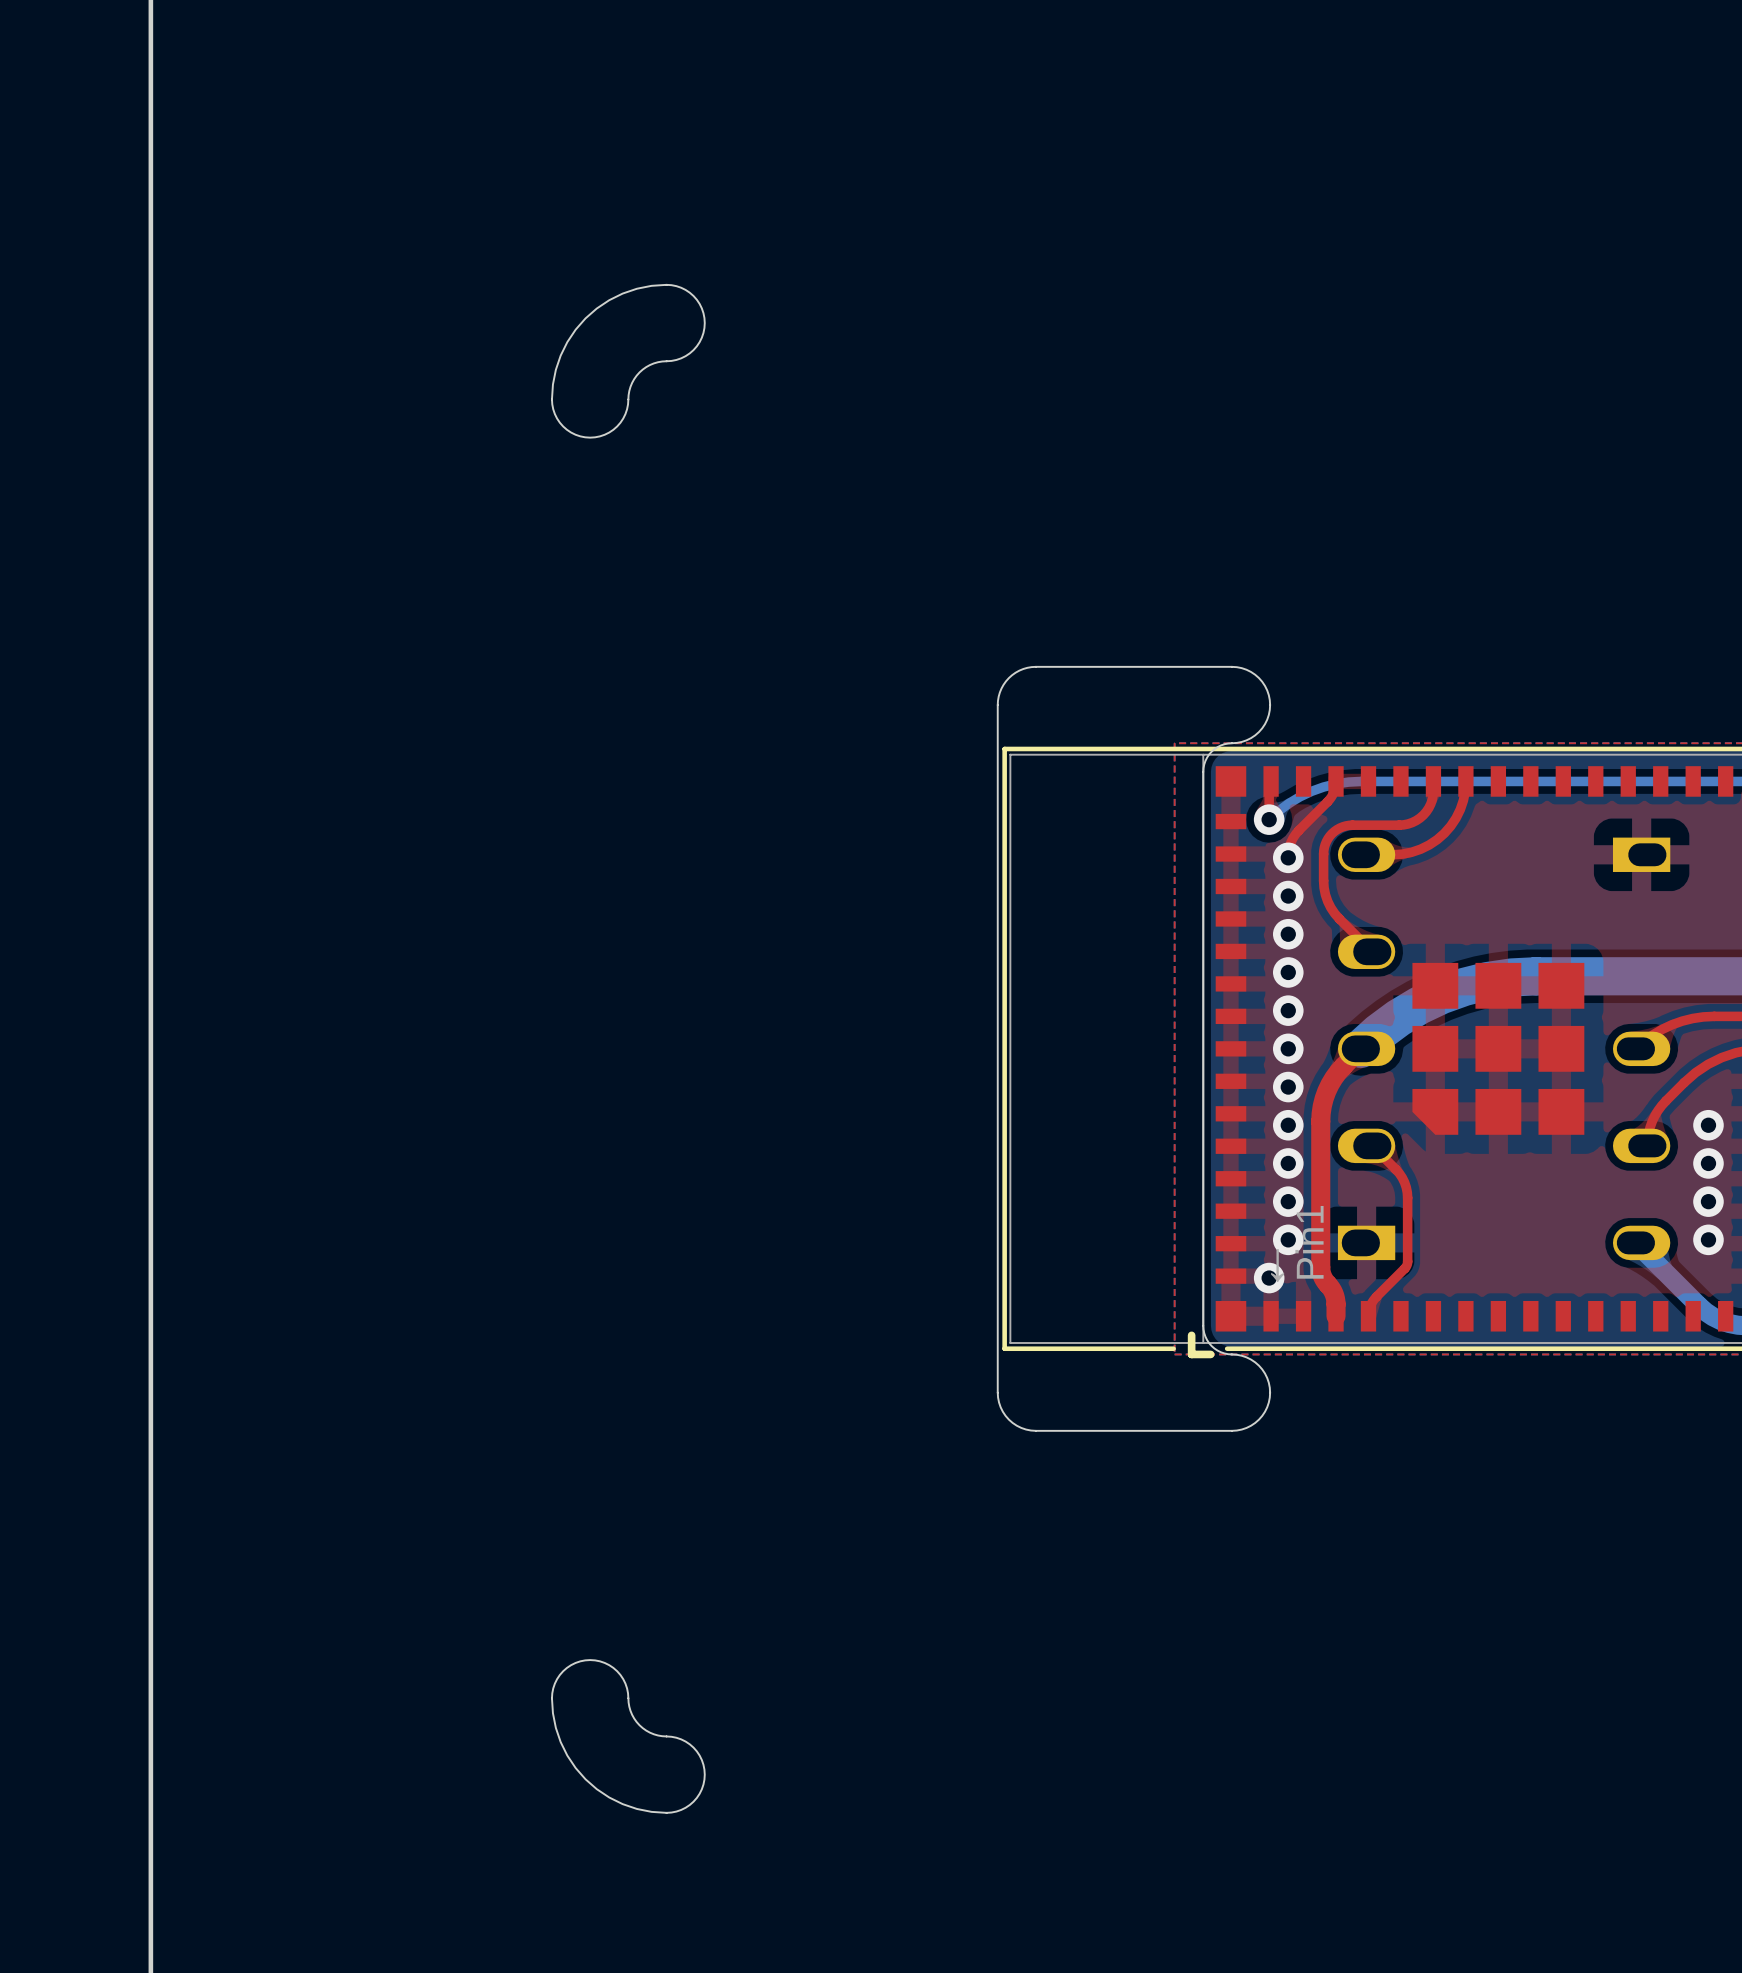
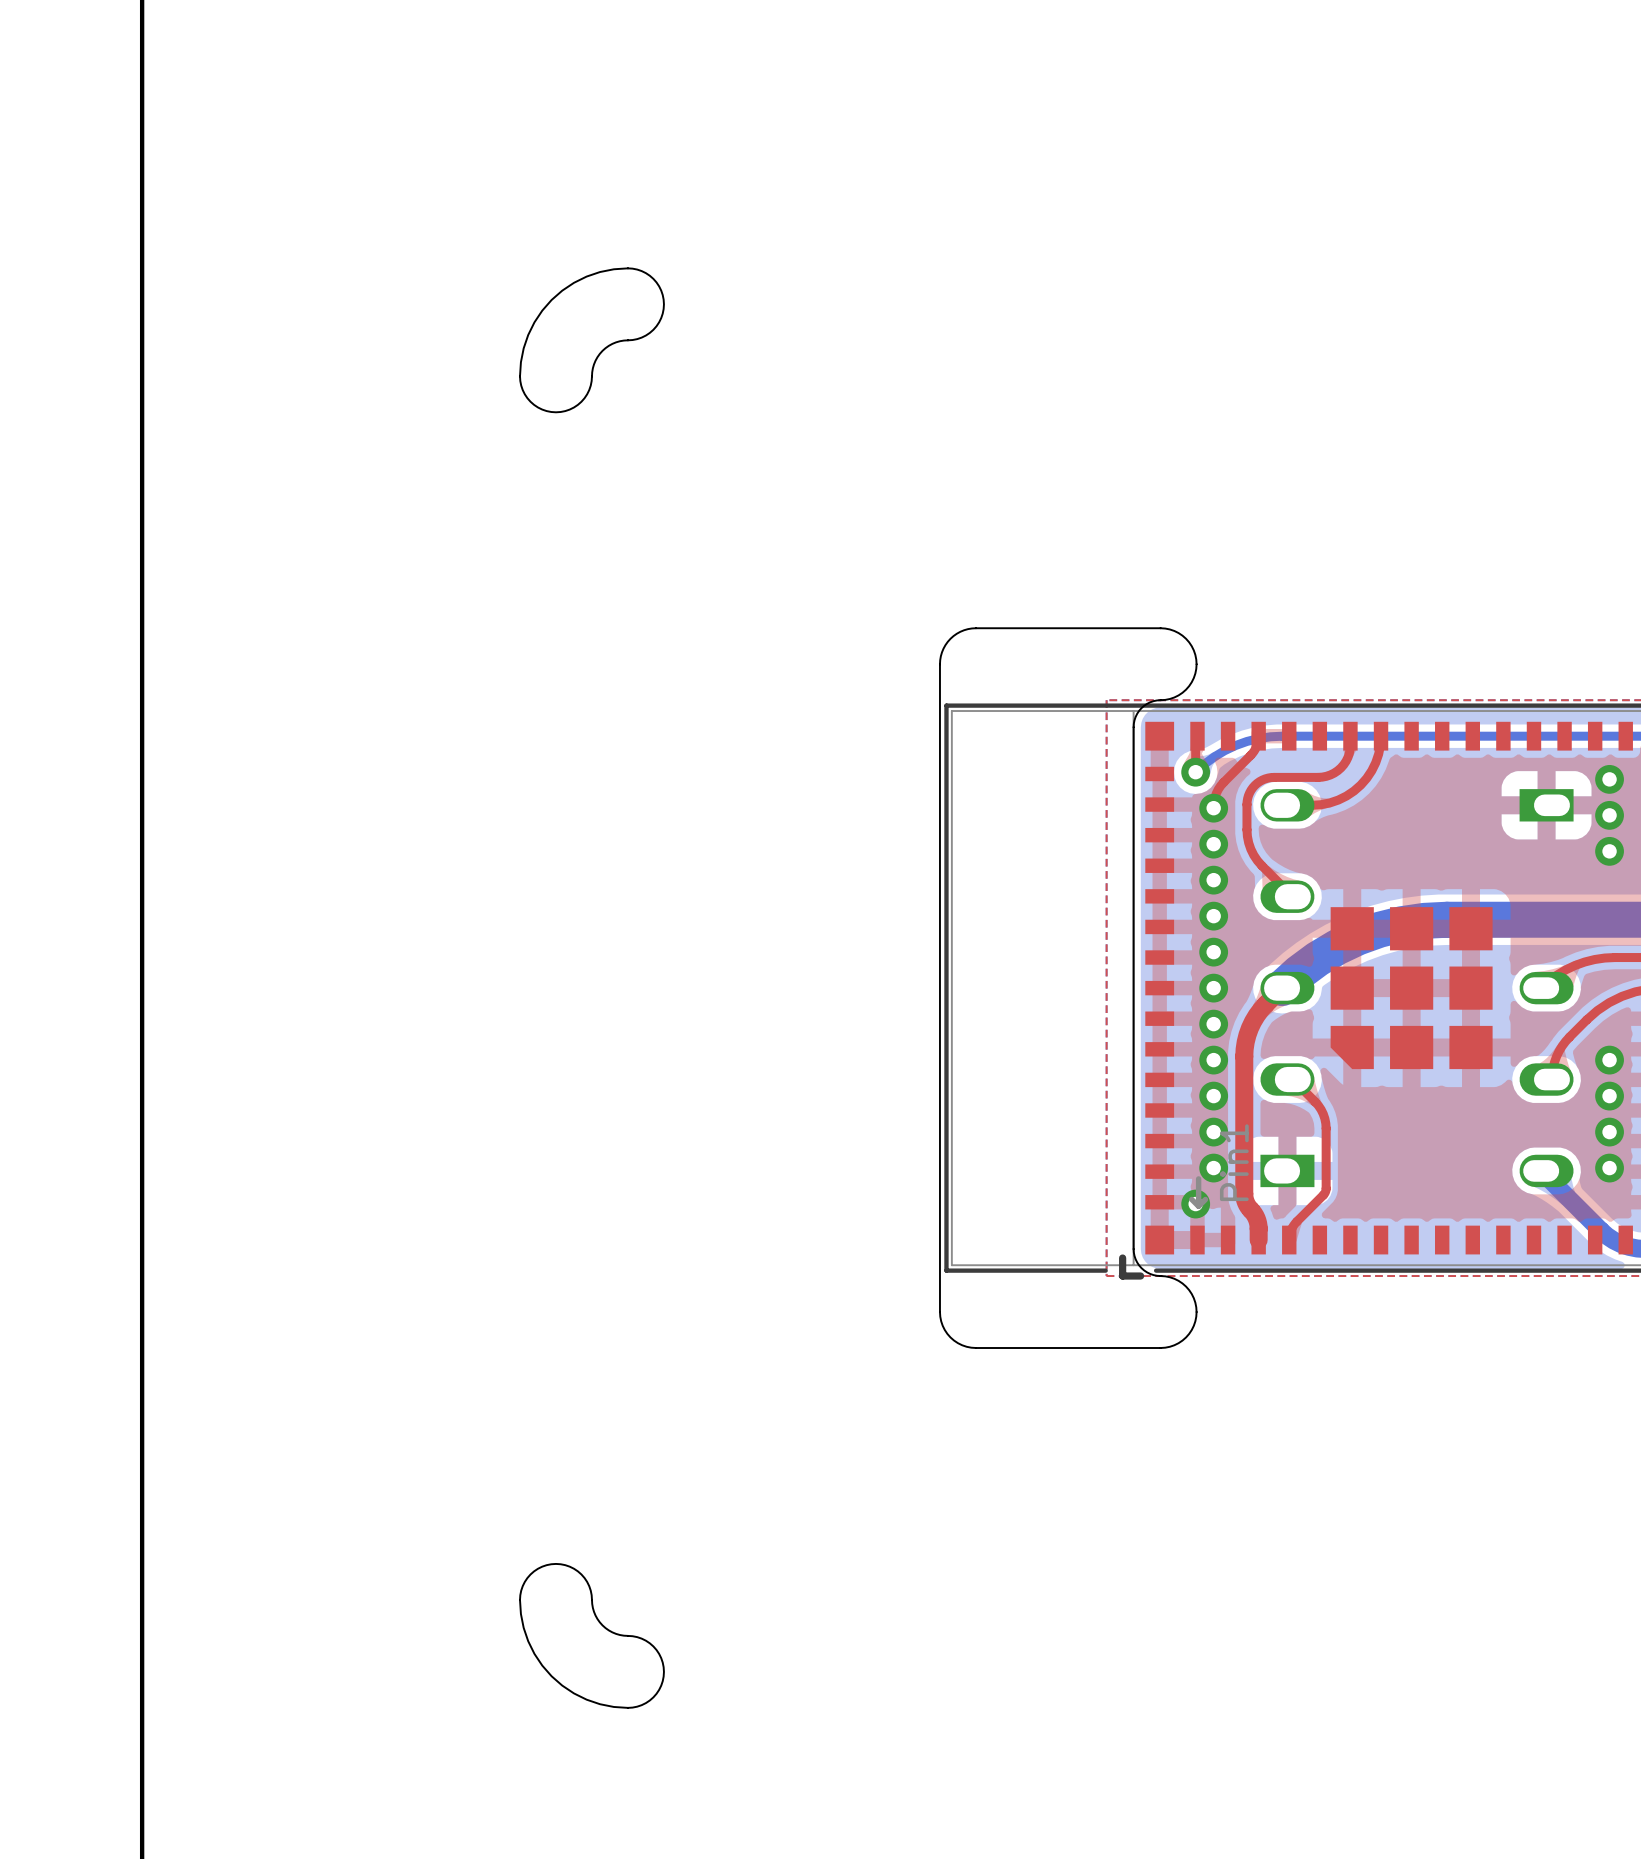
via: none -> (1609, 779)
via: none -> (1609, 815)
via: none -> (1609, 851)

